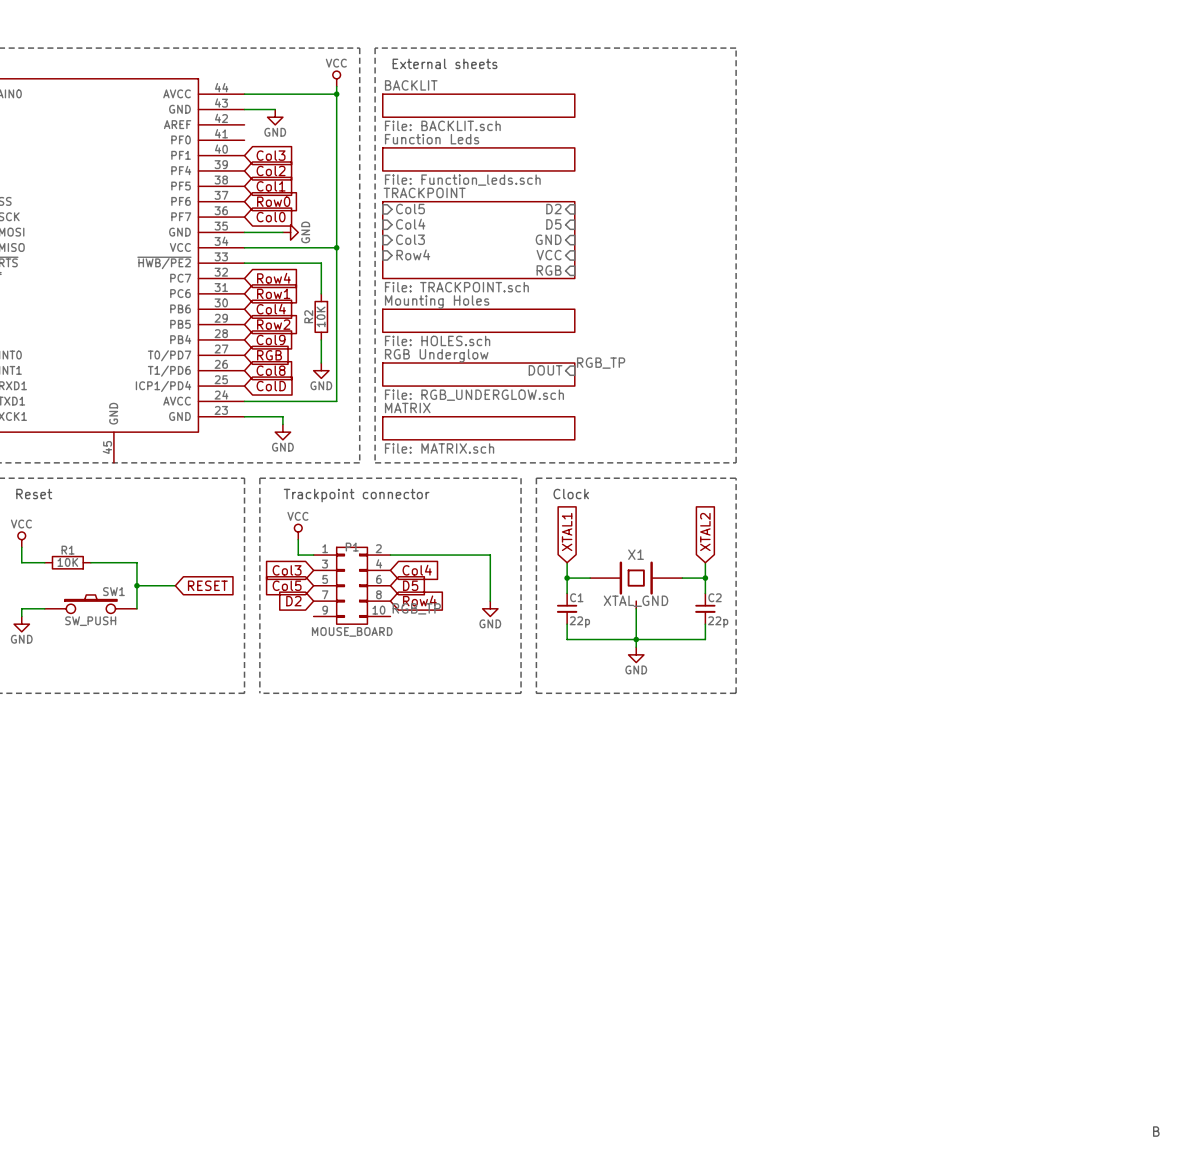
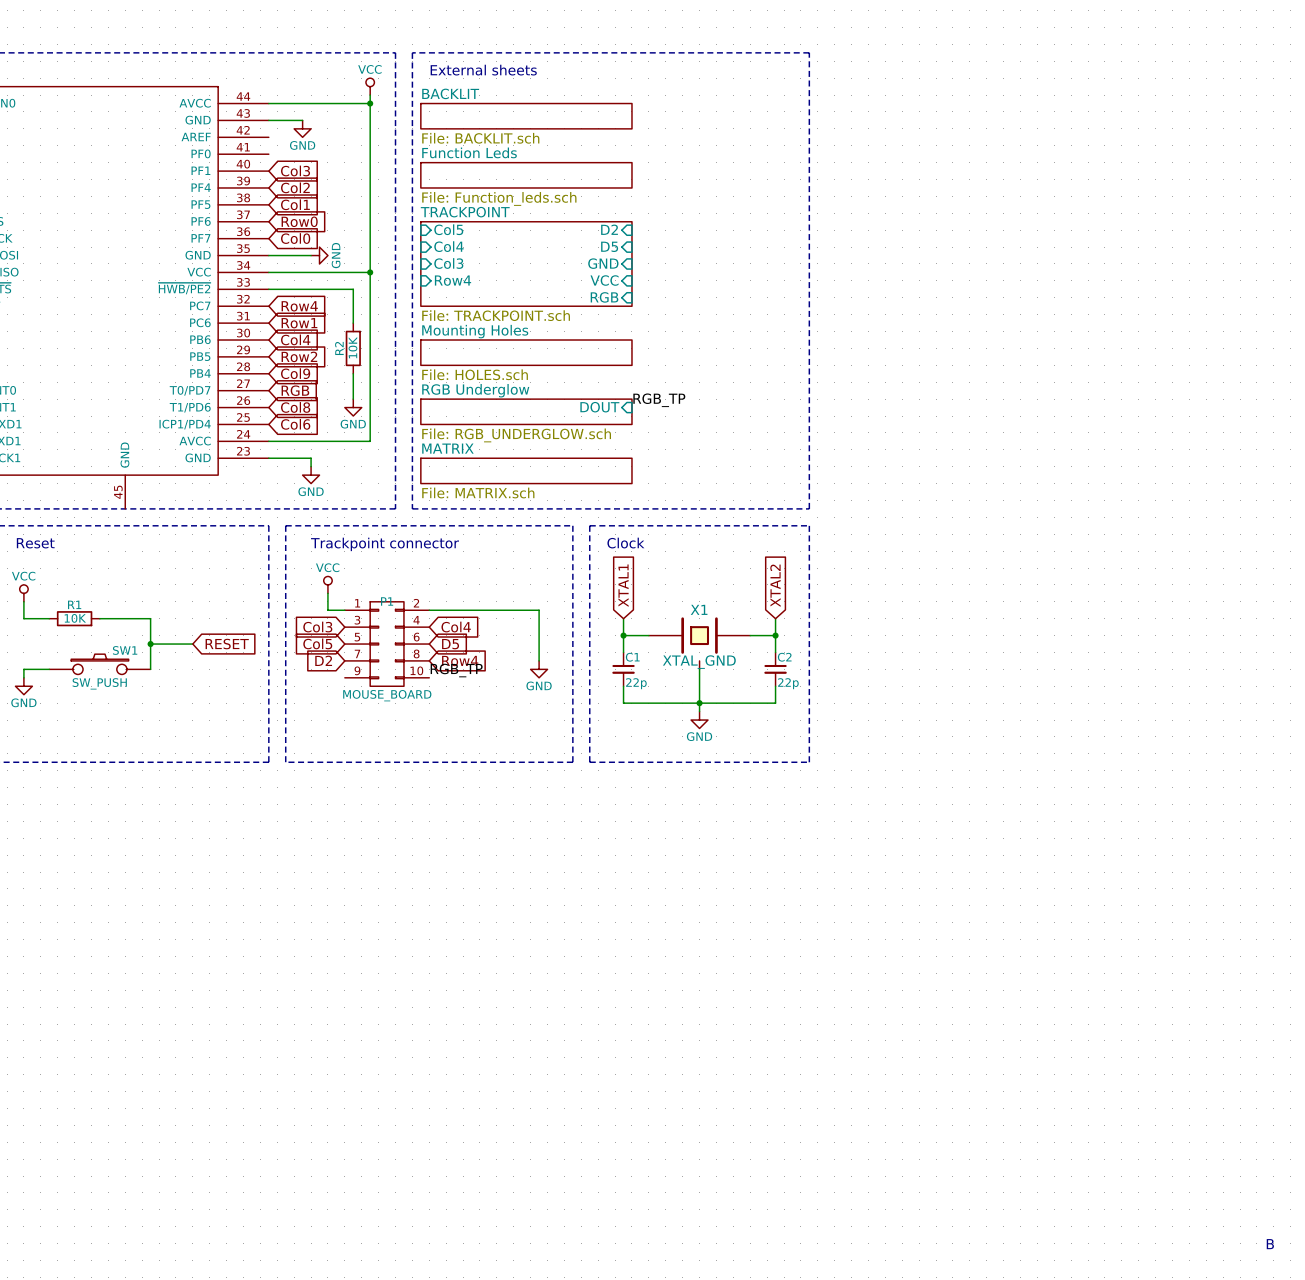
global label: ColD (271, 386) -> Col6 (295, 424)

